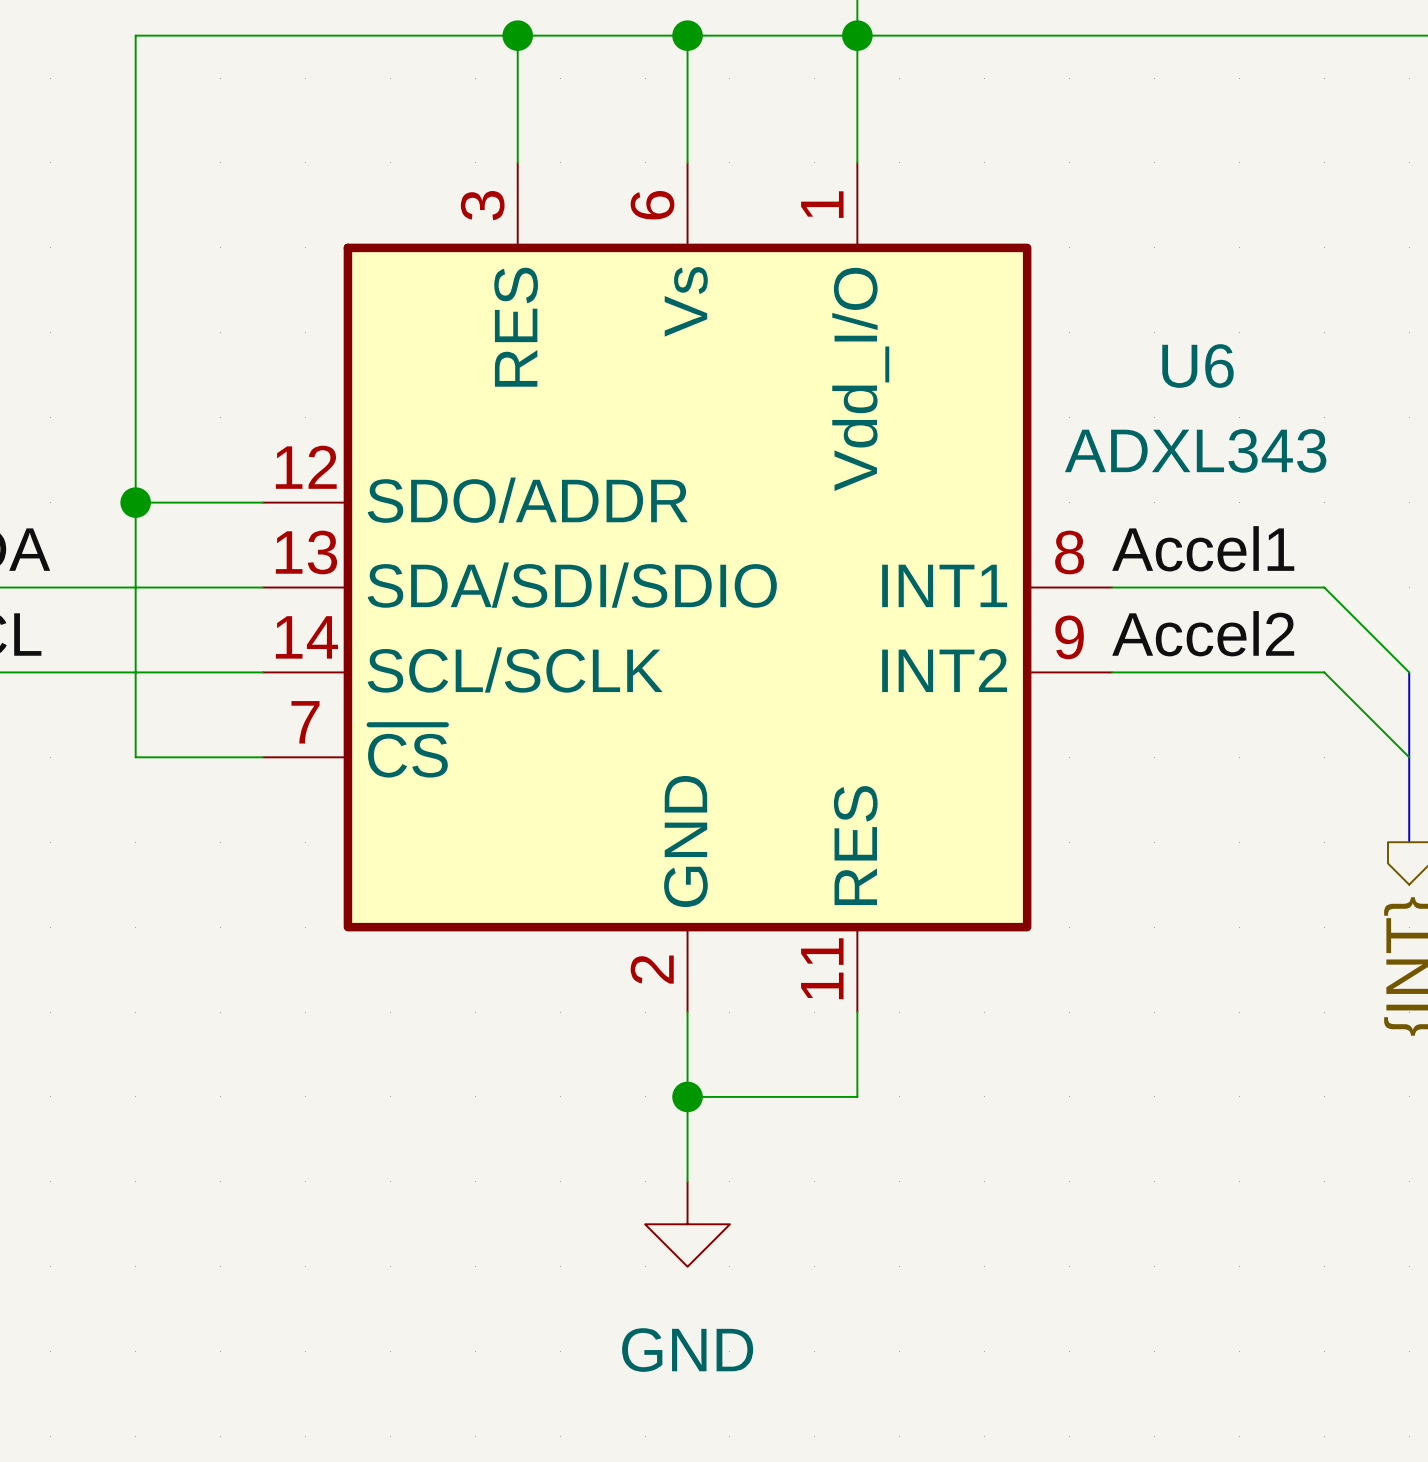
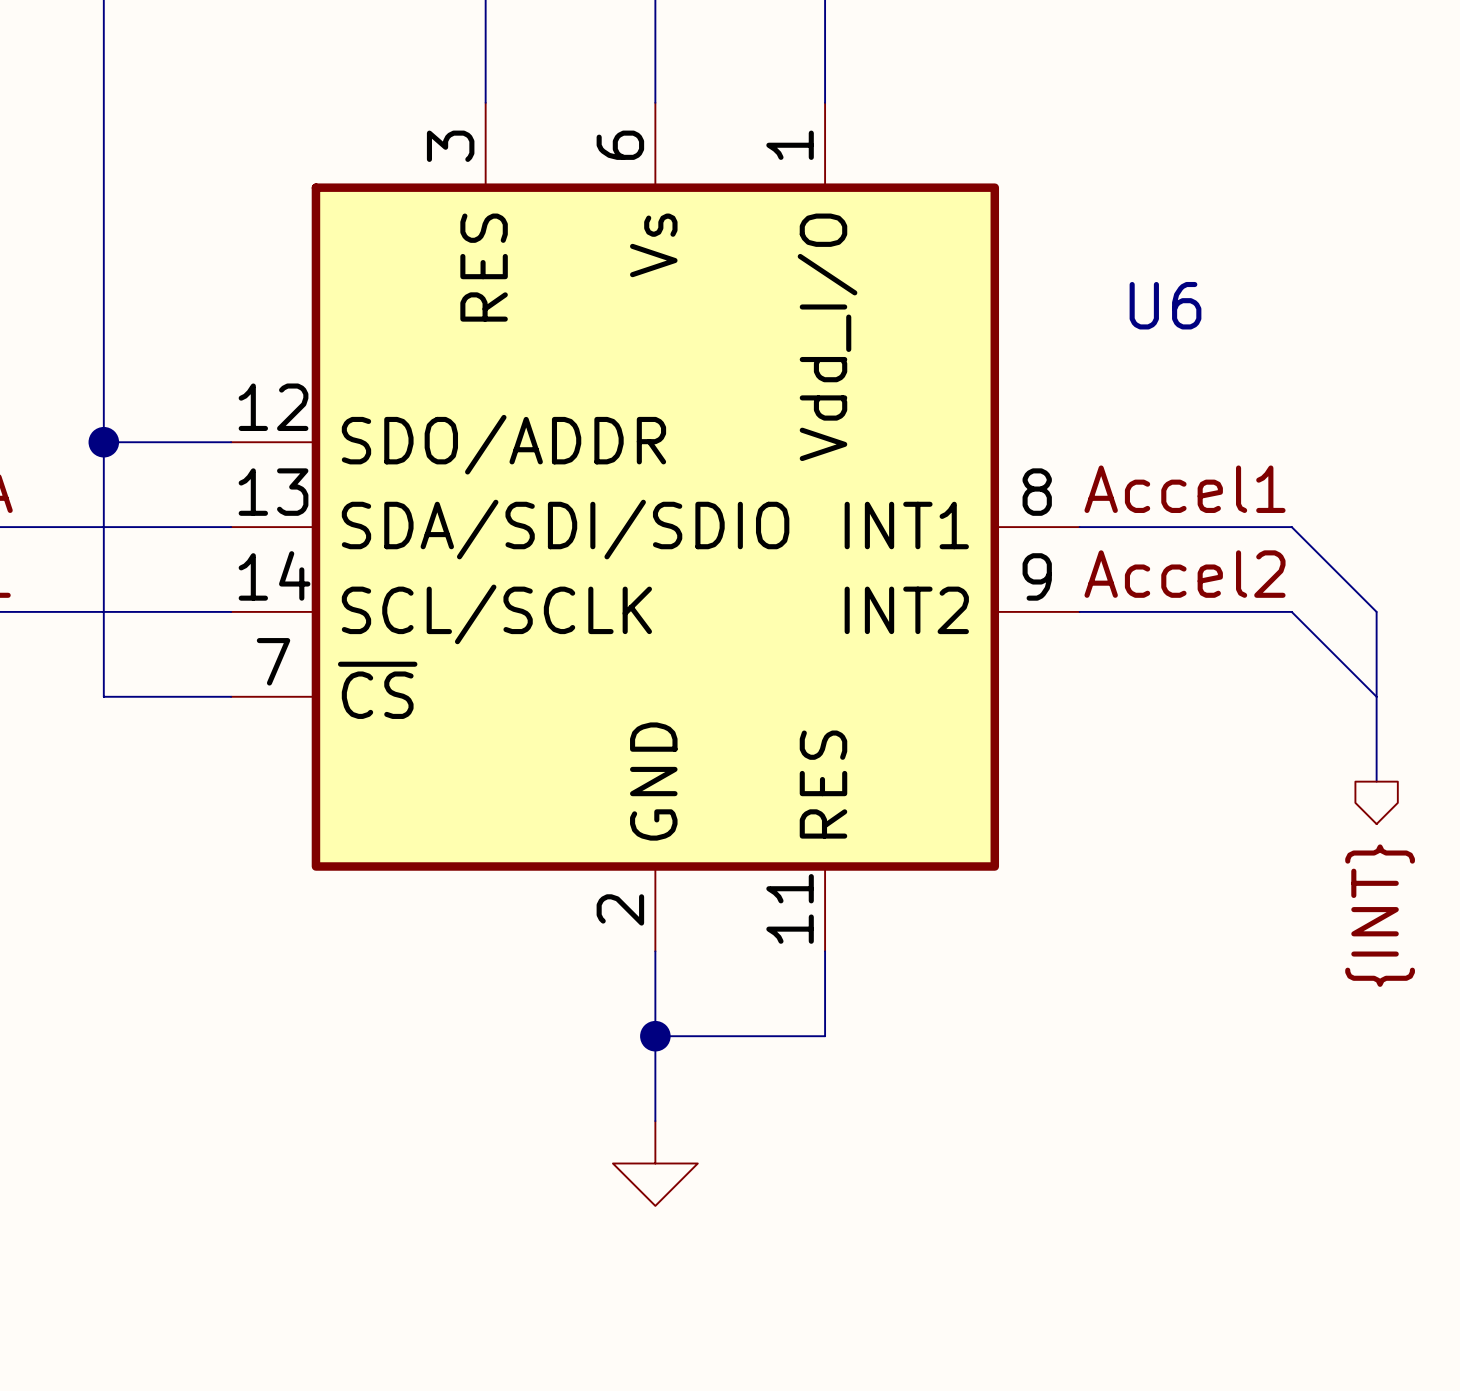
U6 value: ADXL343 (1195, 450) -> none
power symbol text: GND (687, 1350) -> none

